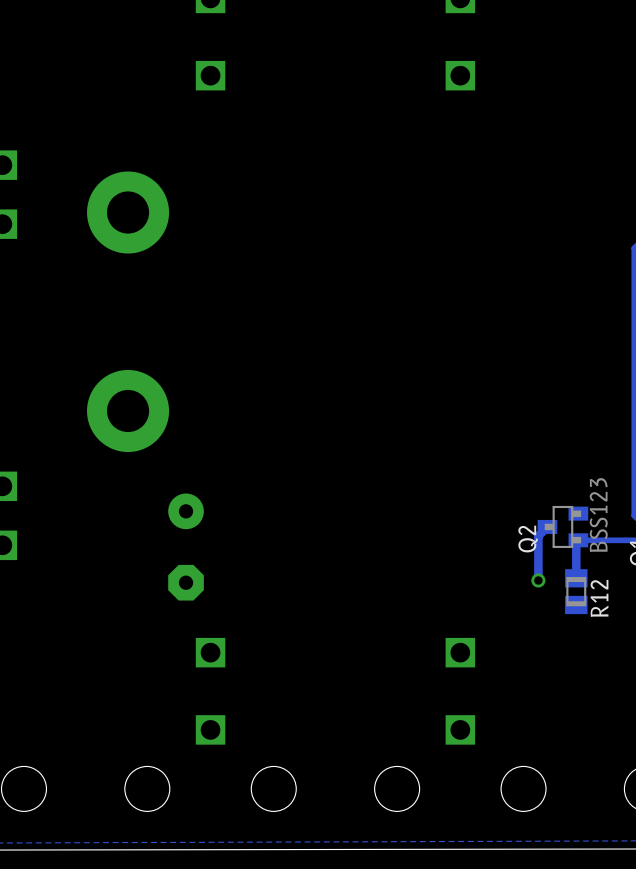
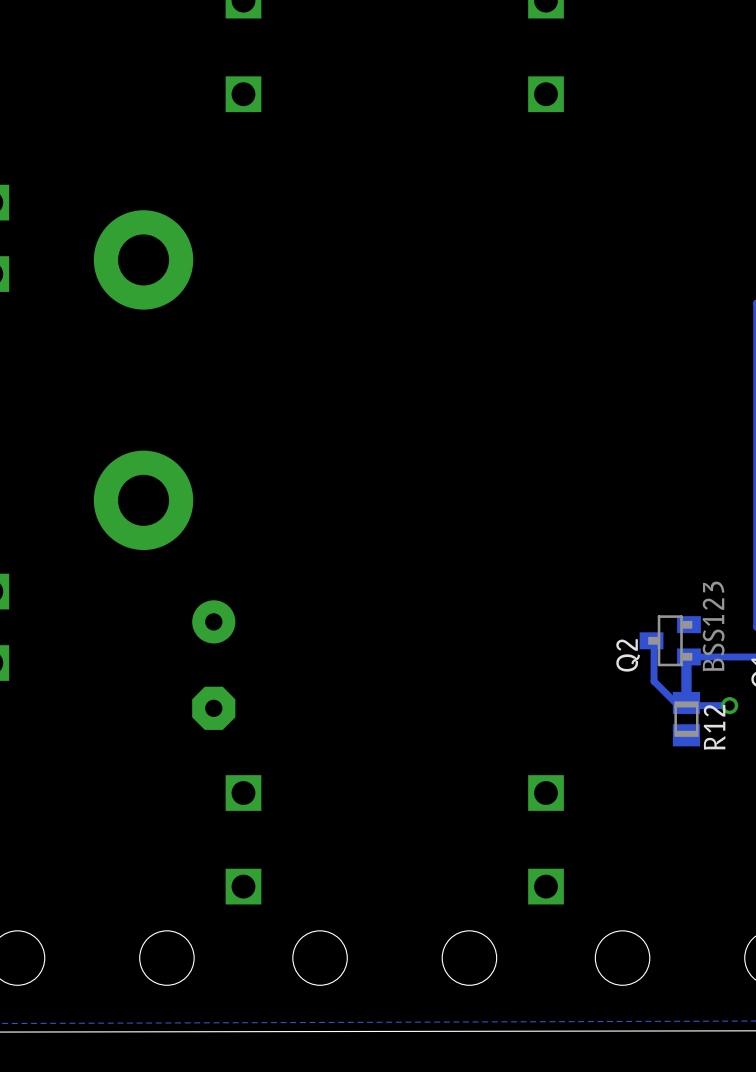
track: (547, 526) (538, 536) (538, 580) -> (651, 640) (654, 643) (654, 681) (678, 705) (729, 705)
via position: (538, 580) -> (729, 705)

